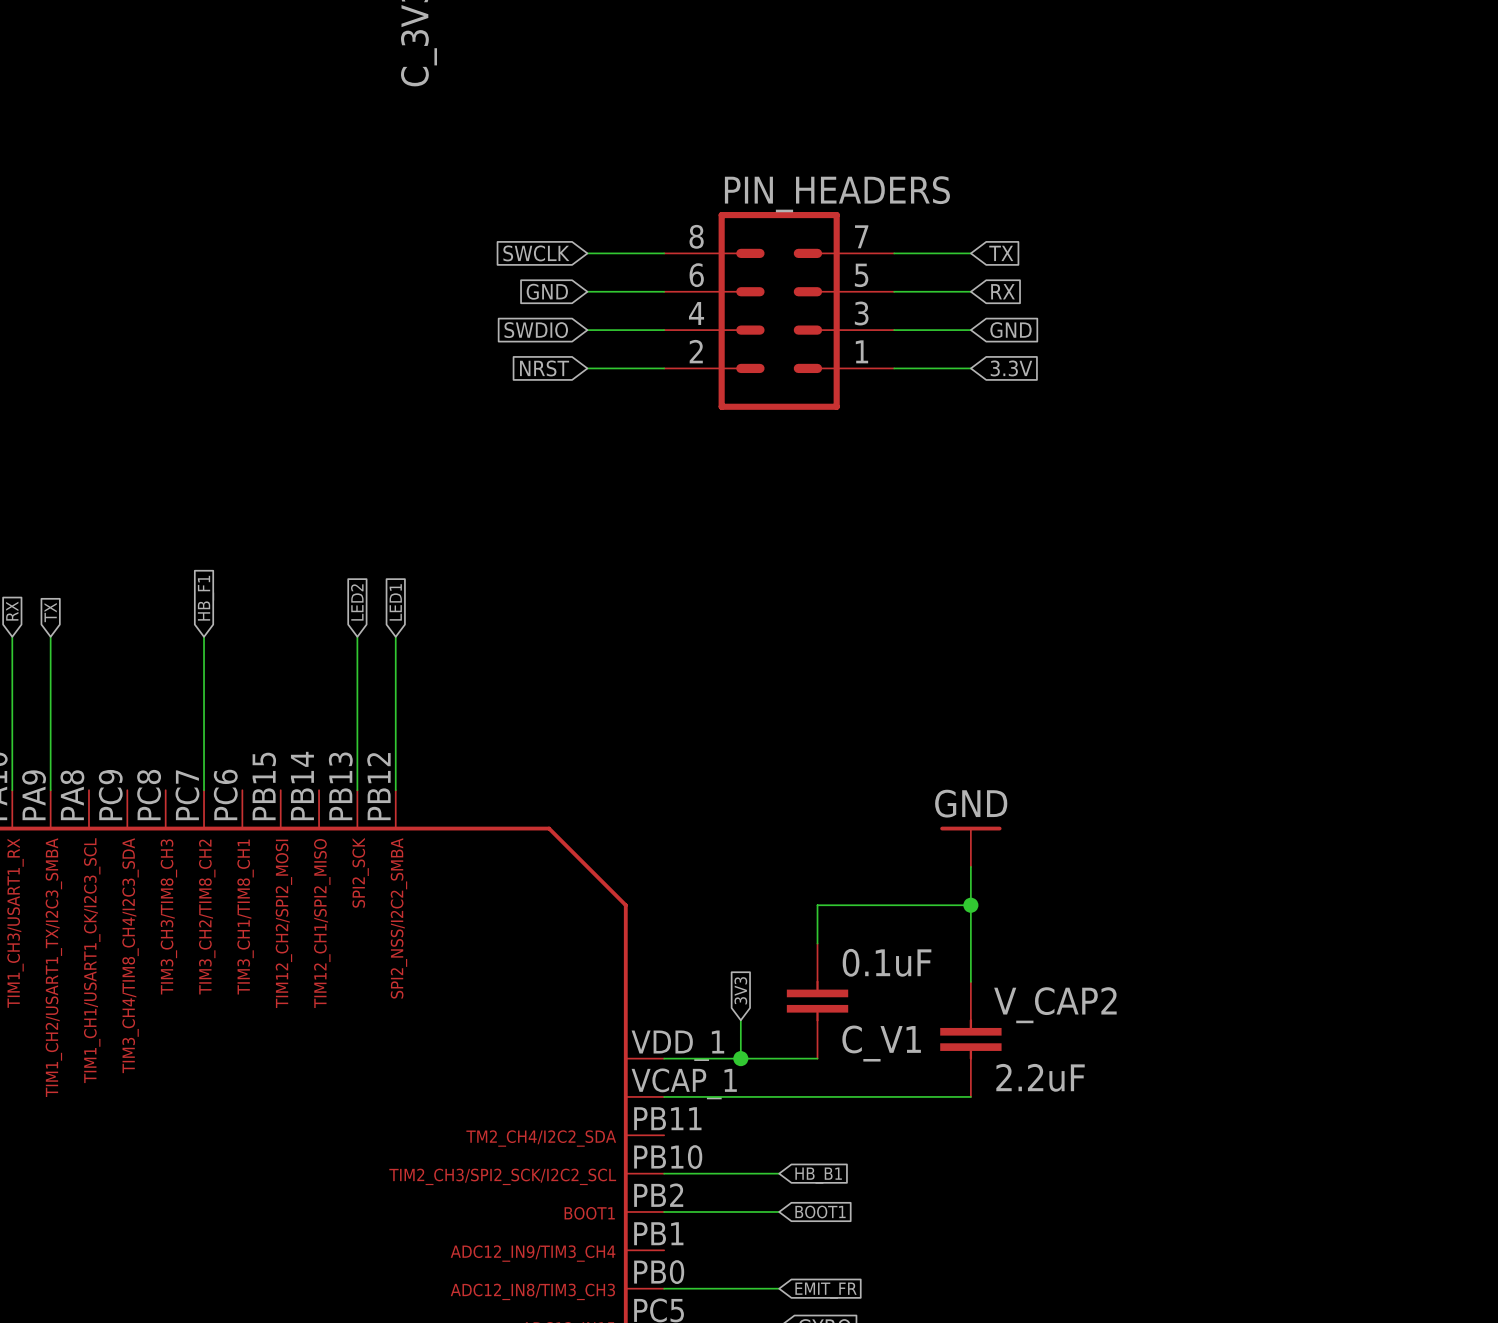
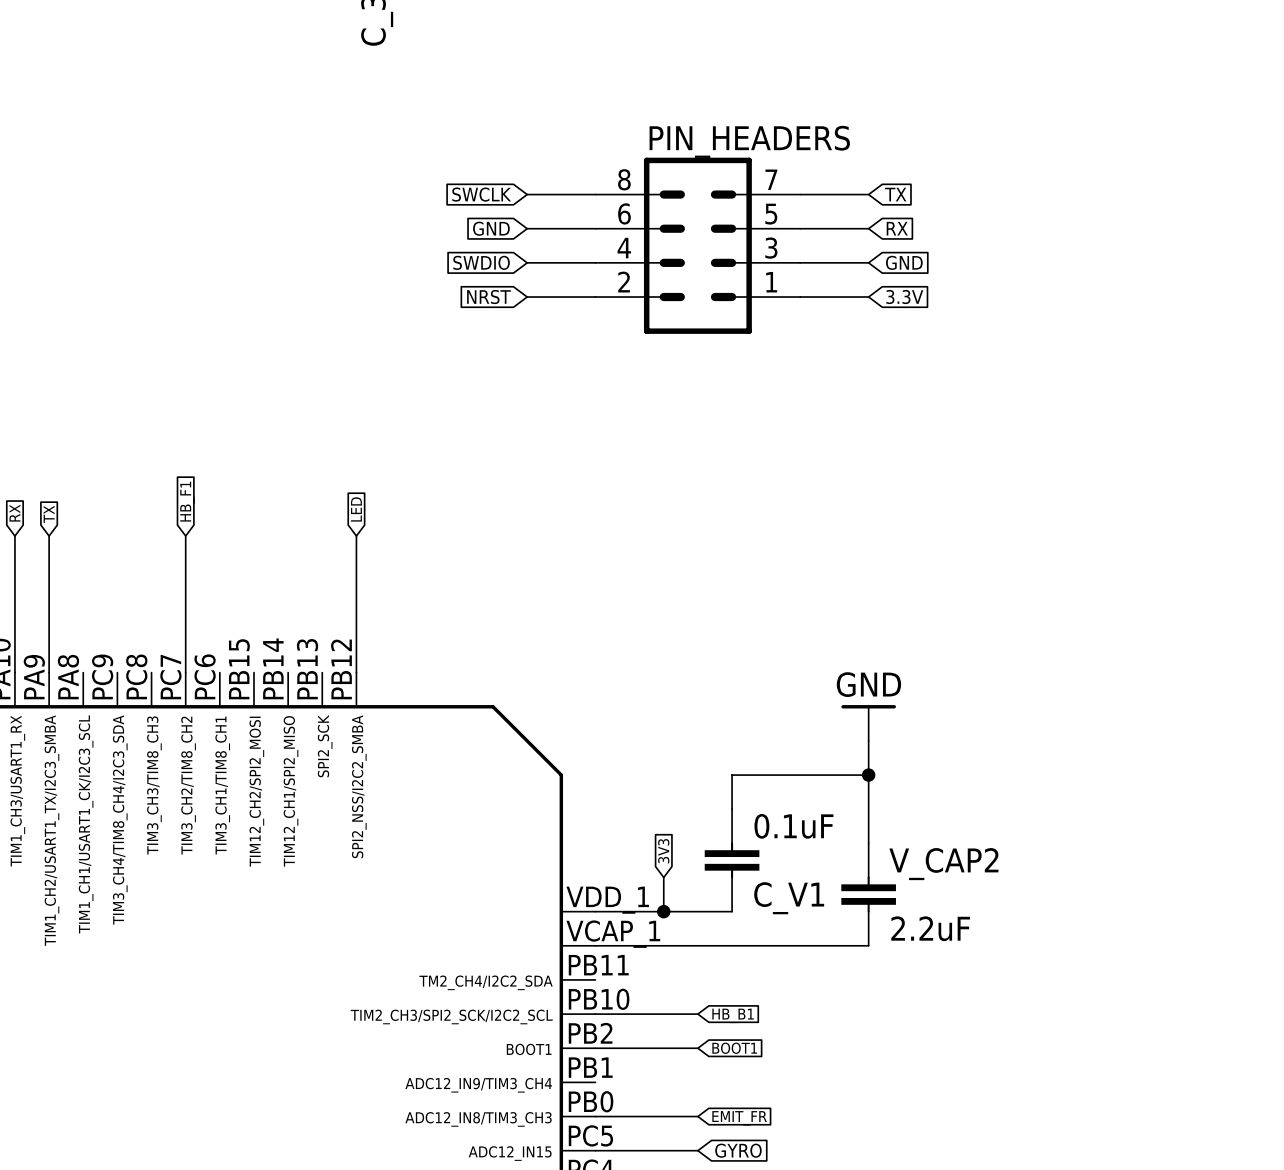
global label: LED2 (357, 602) -> none
global label: LED1 (395, 602) -> LED (356, 509)
wire: (357, 636) (357, 790) -> none

